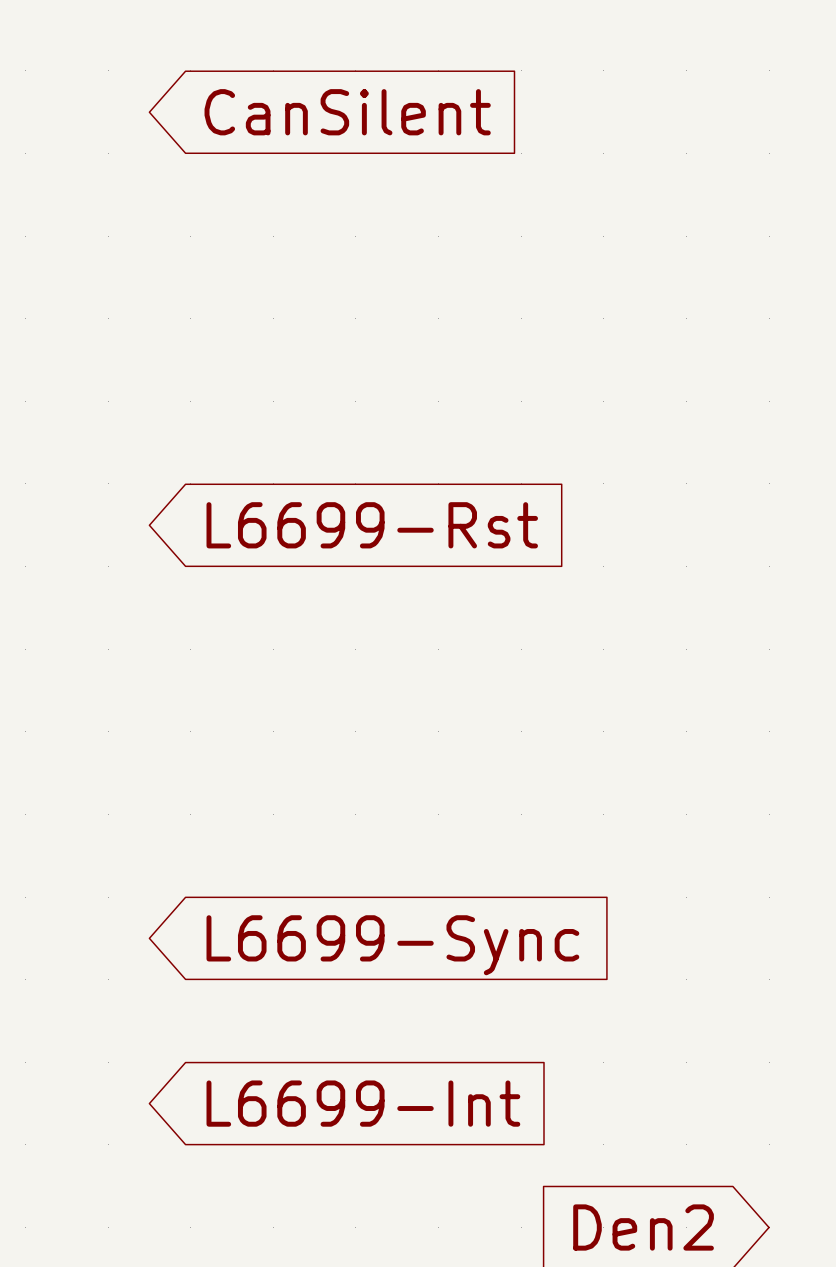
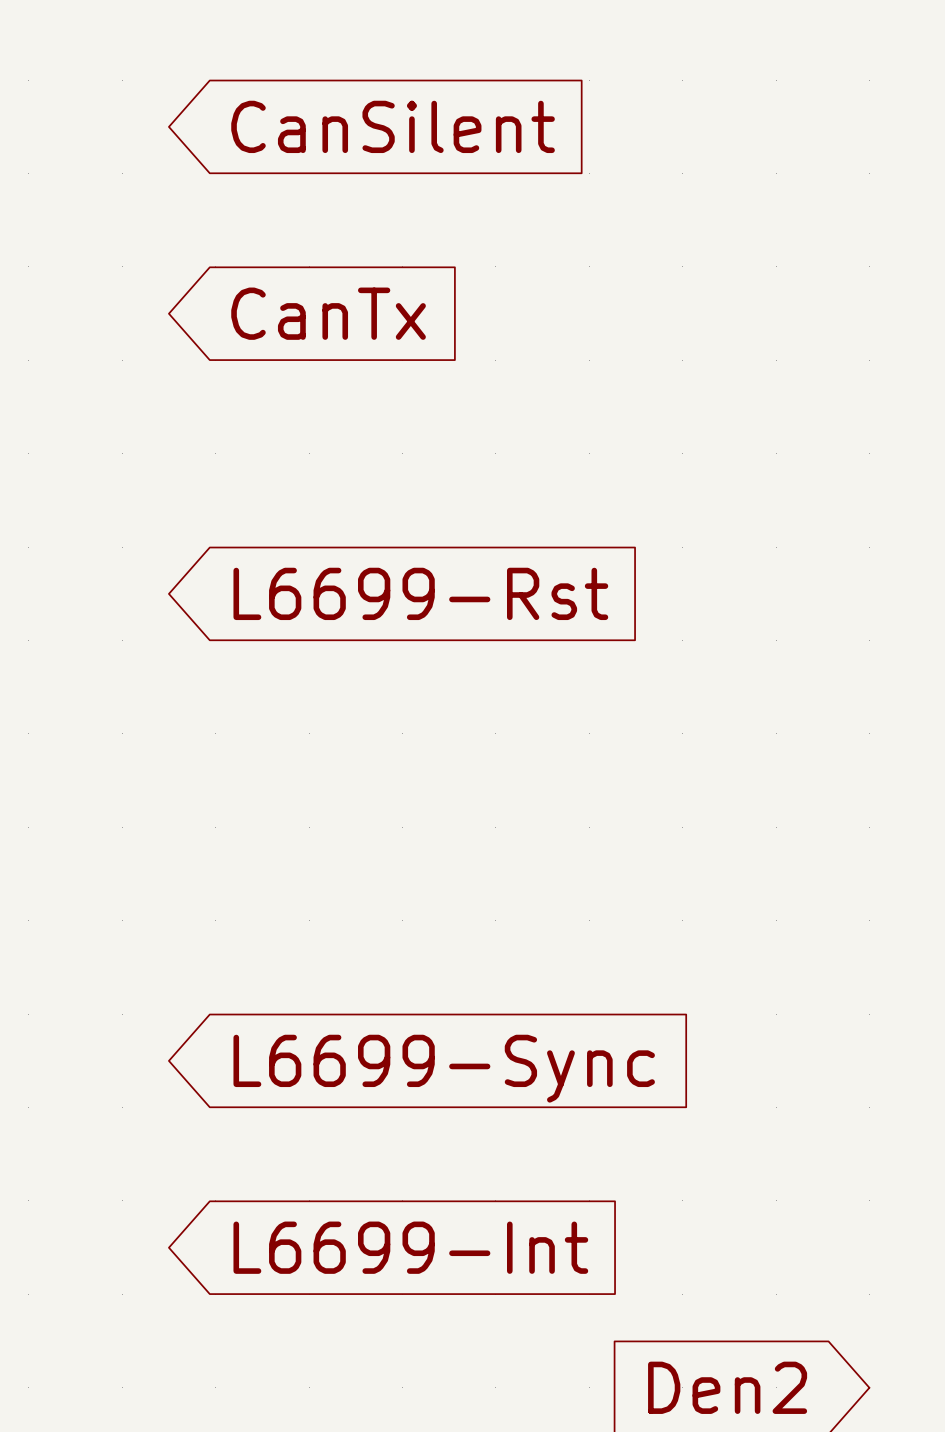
global label: none -> CanTx (328, 313)

